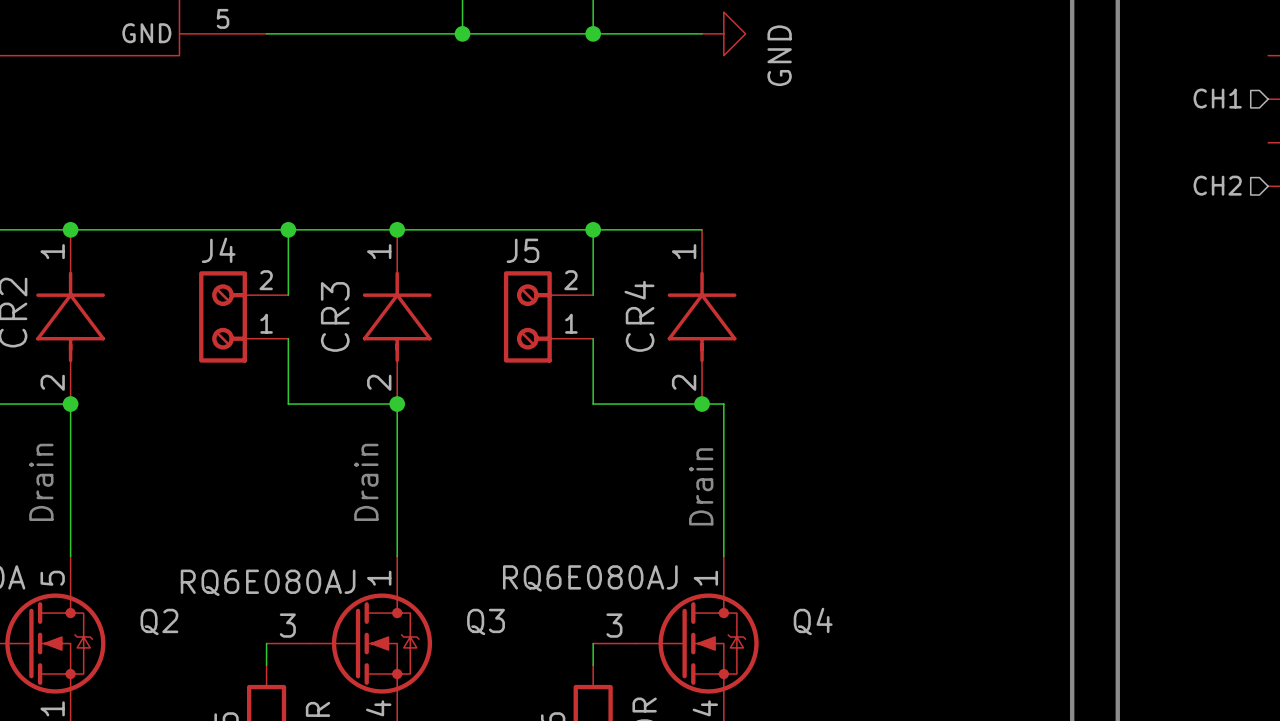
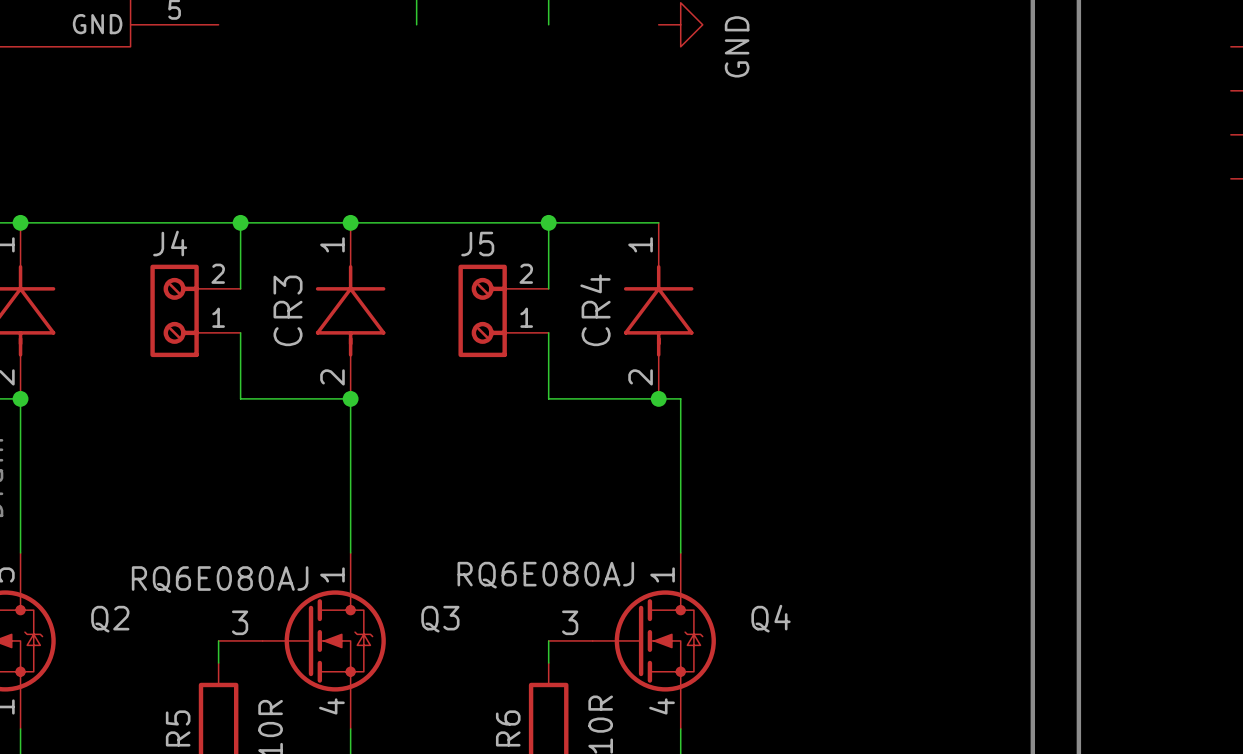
wire: (266, 33) (702, 33) -> none
junction: (462, 33) -> none
junction: (593, 33) -> none
hierarchical label: CH1 (1217, 98) -> none
hierarchical label: CH2 (1217, 185) -> none
text: Drain (366, 482) -> none
text: Drain (701, 486) -> none

